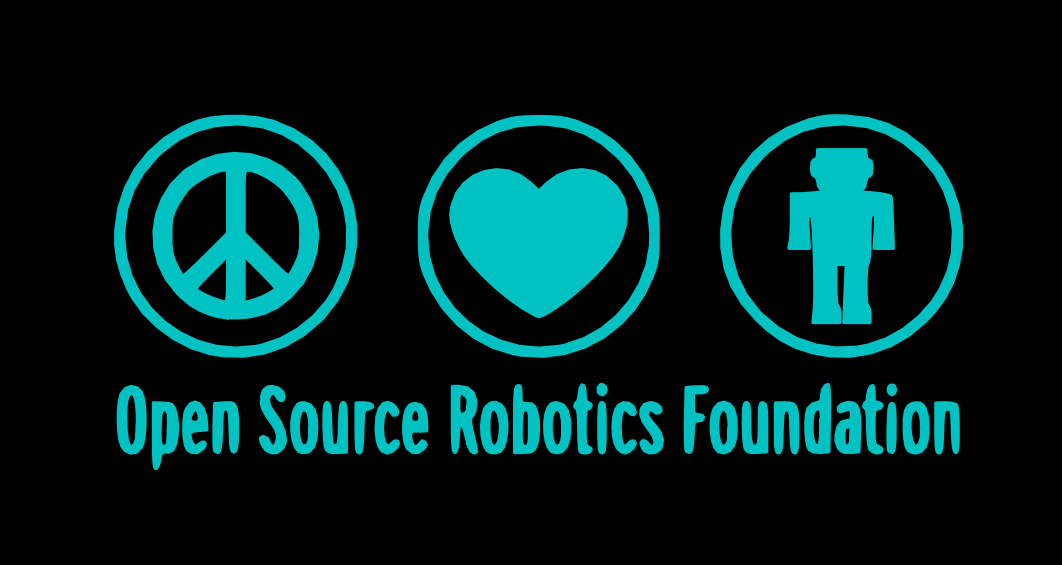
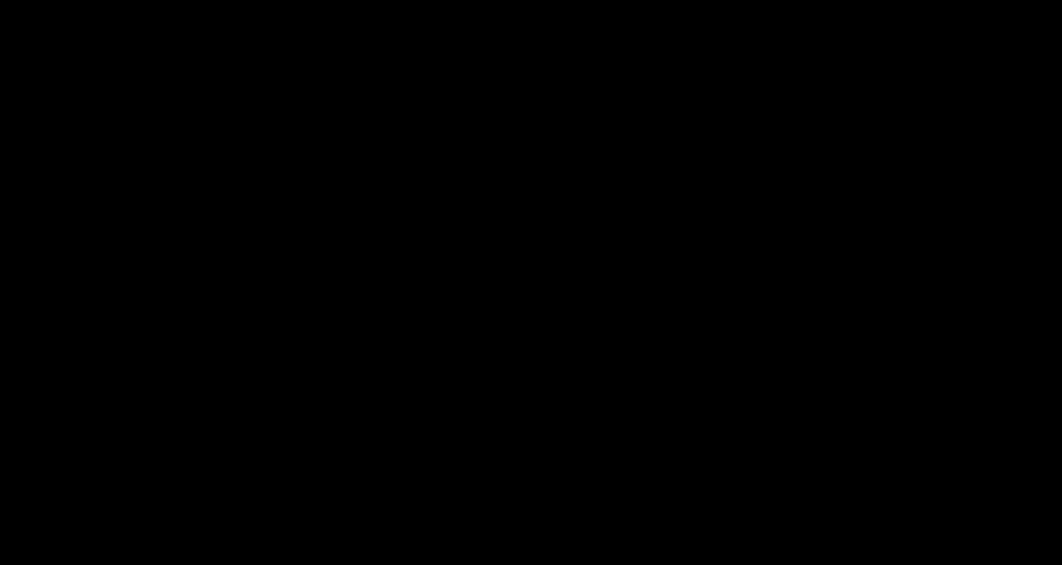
drawing: [114, 114, 964, 471] -> none

